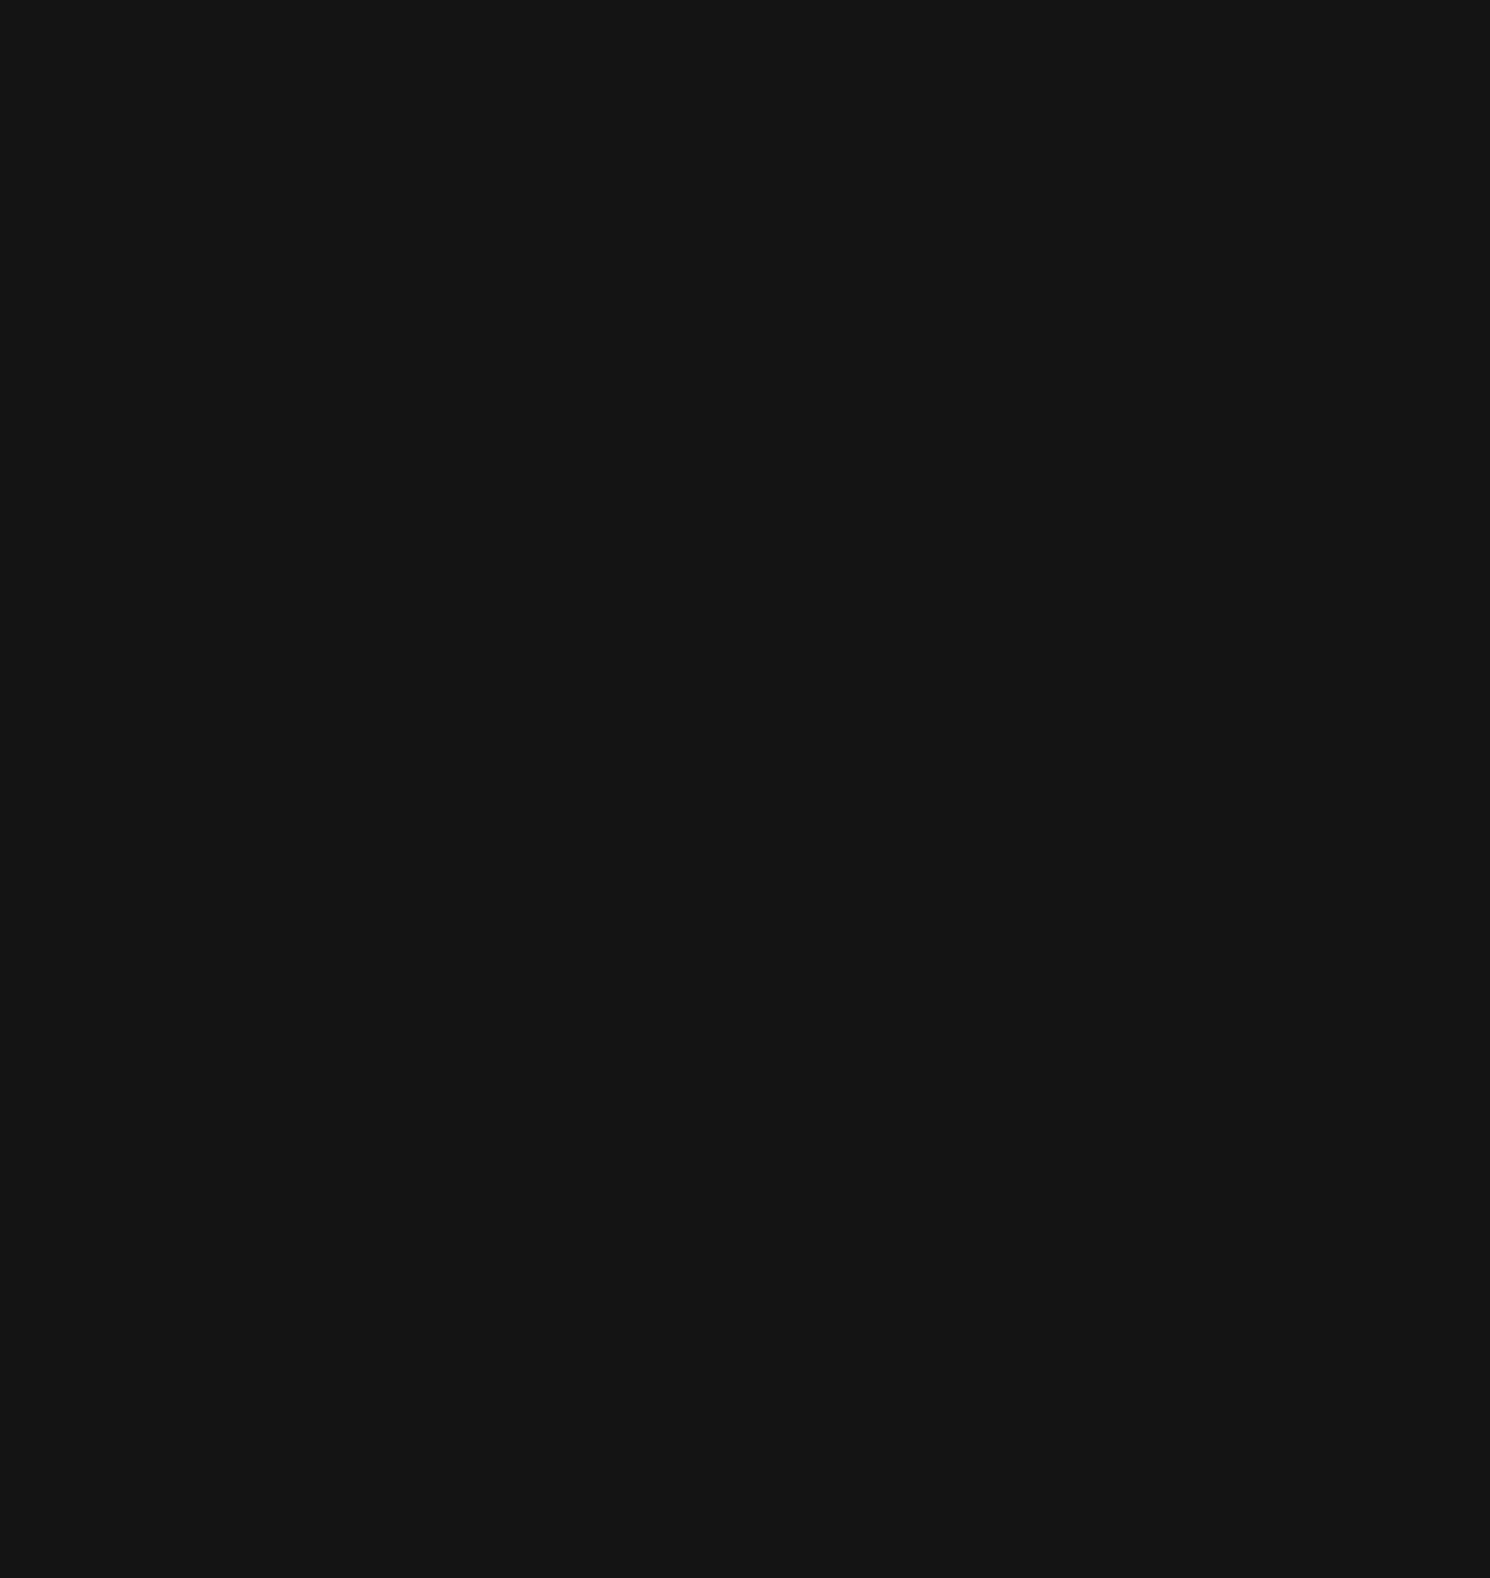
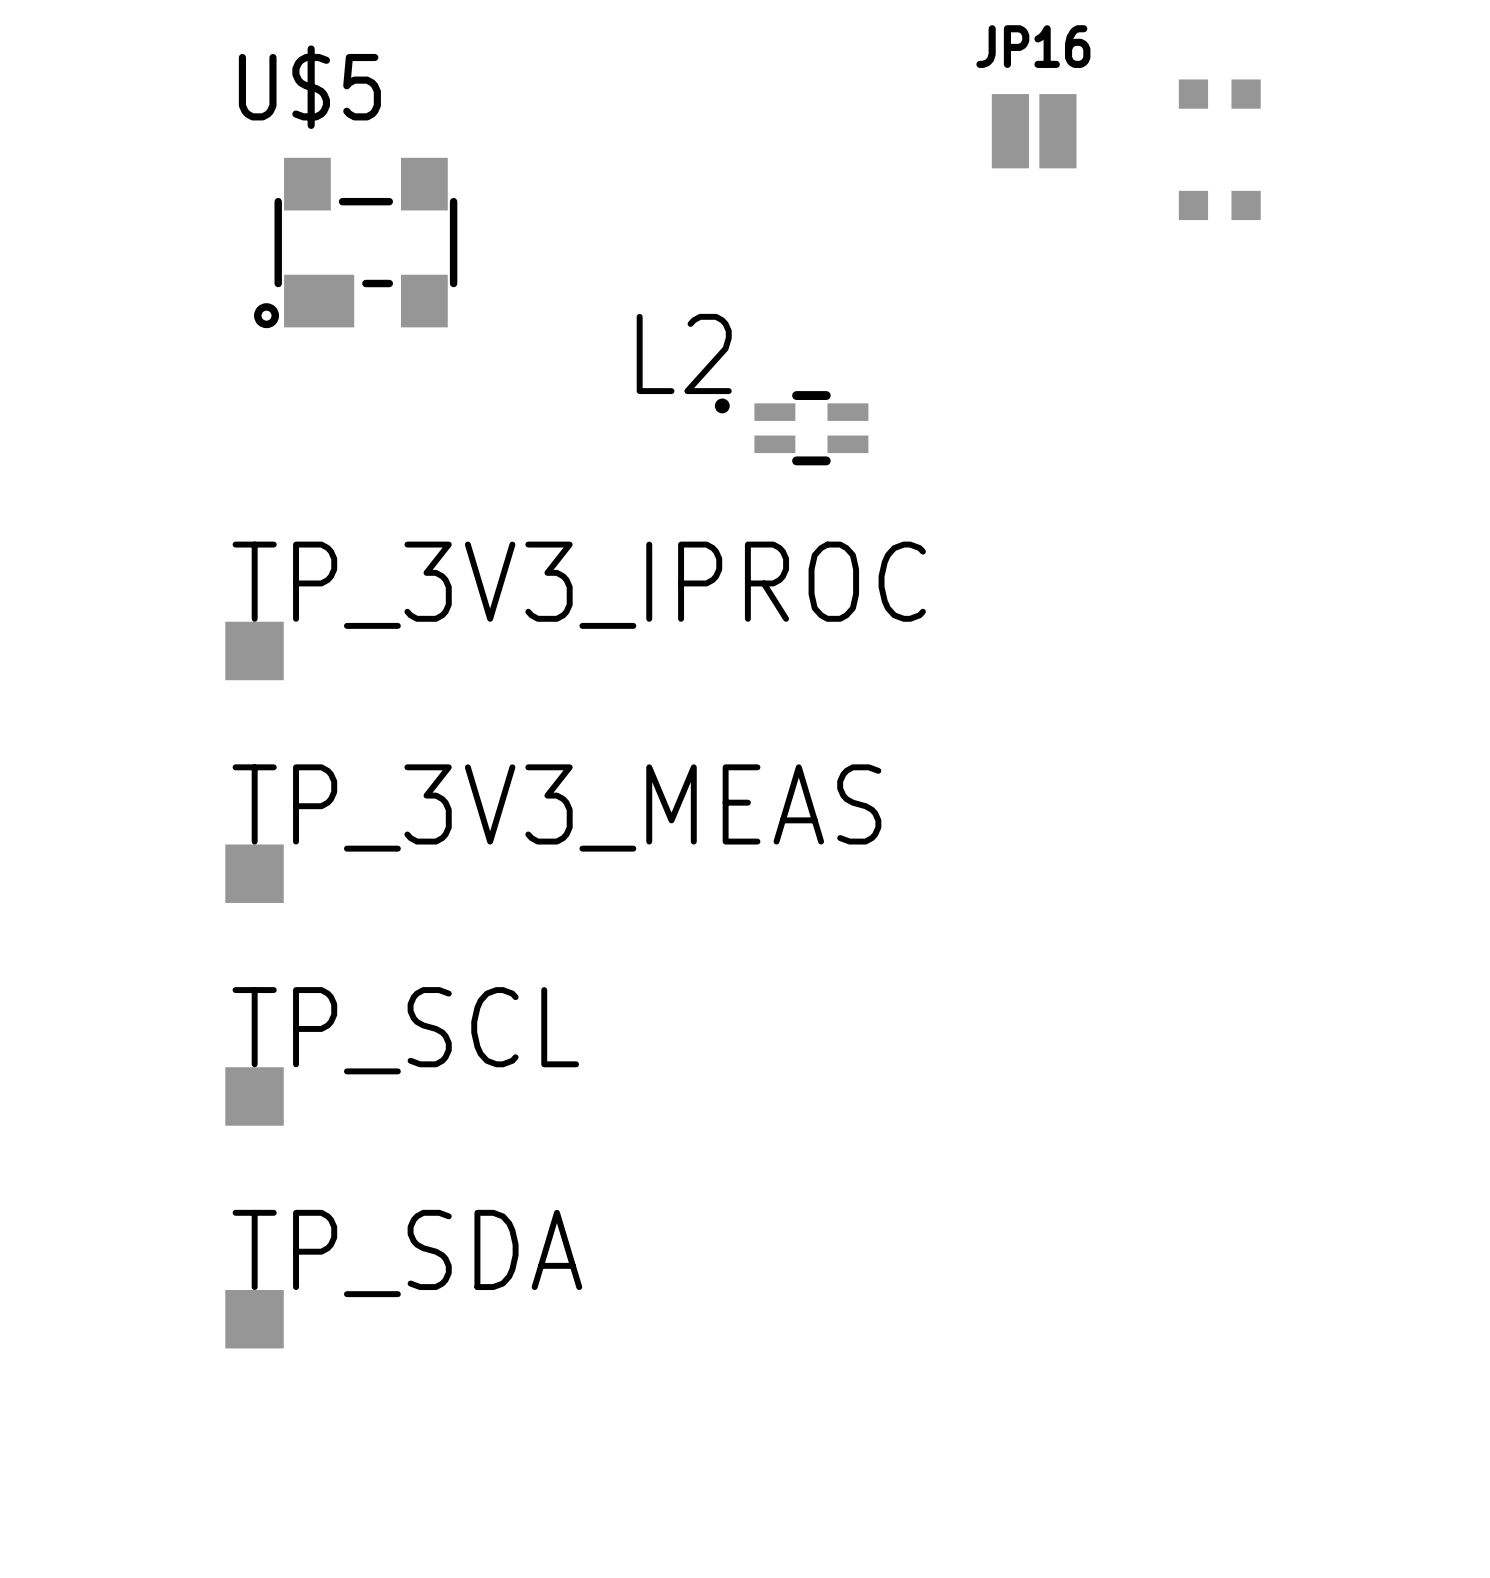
part: none -> (1219, 94)
JP16: none -> (1034, 131)
part: none -> (1219, 205)
U$5: none -> (355, 242)
L2: none -> (791, 428)
TP_3V3_IPROC: none -> (254, 650)
TP_3V3_MEAS: none -> (254, 873)
TP_SCL: none -> (254, 1096)
TP_SDA: none -> (254, 1319)

